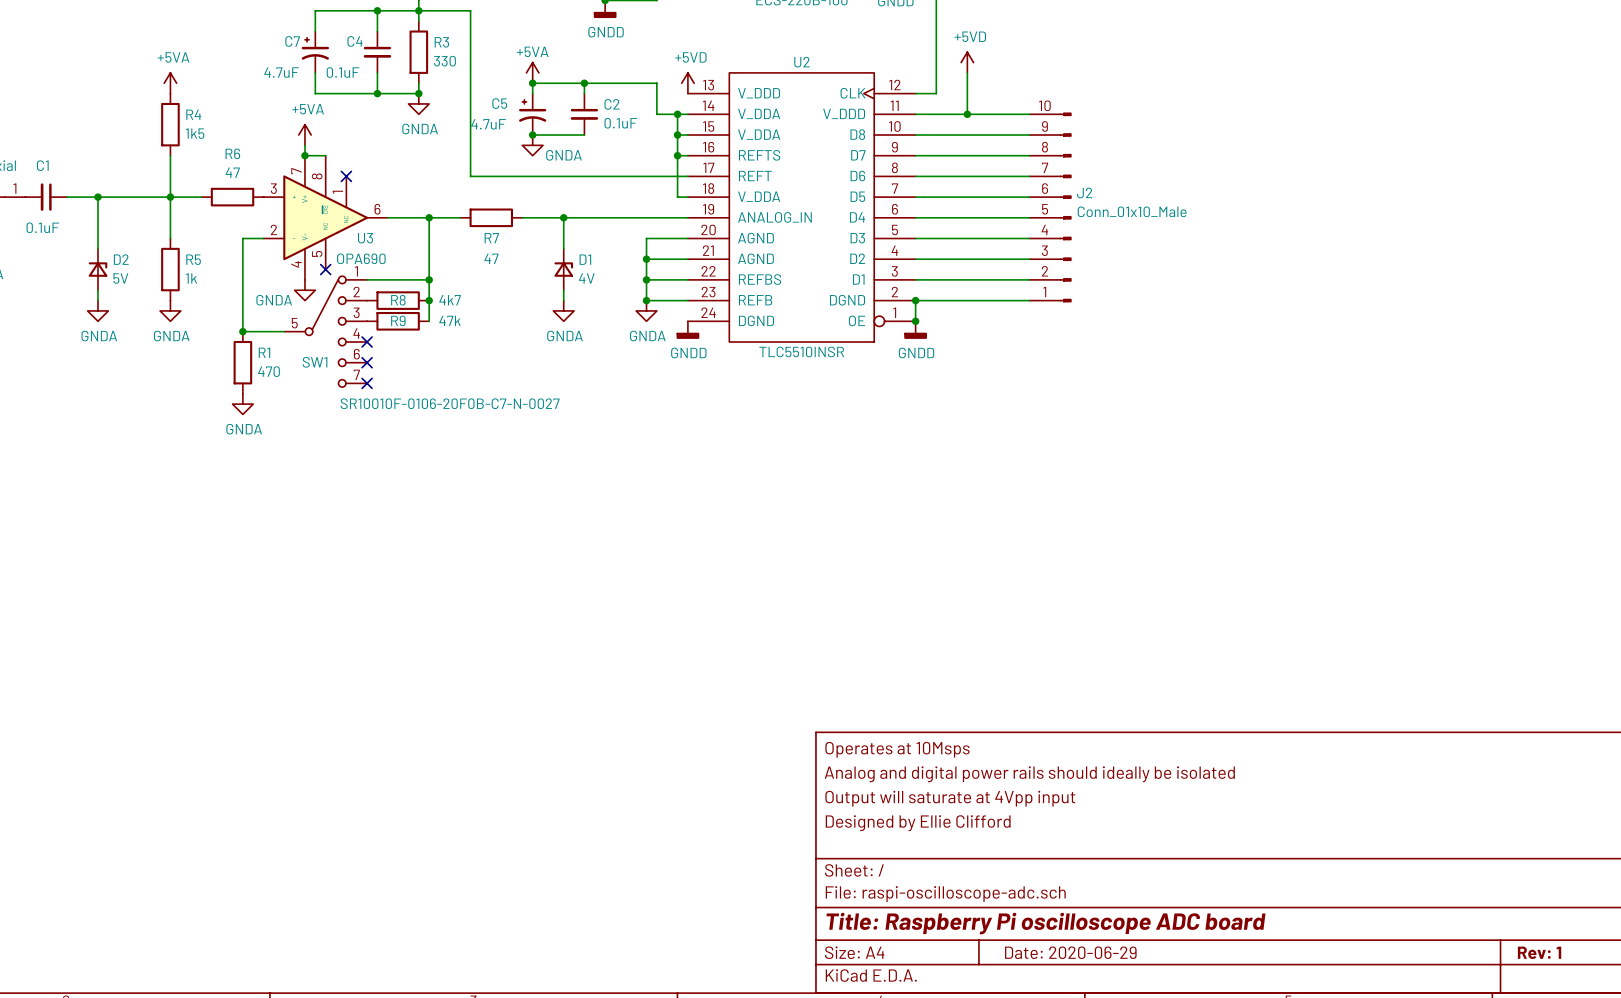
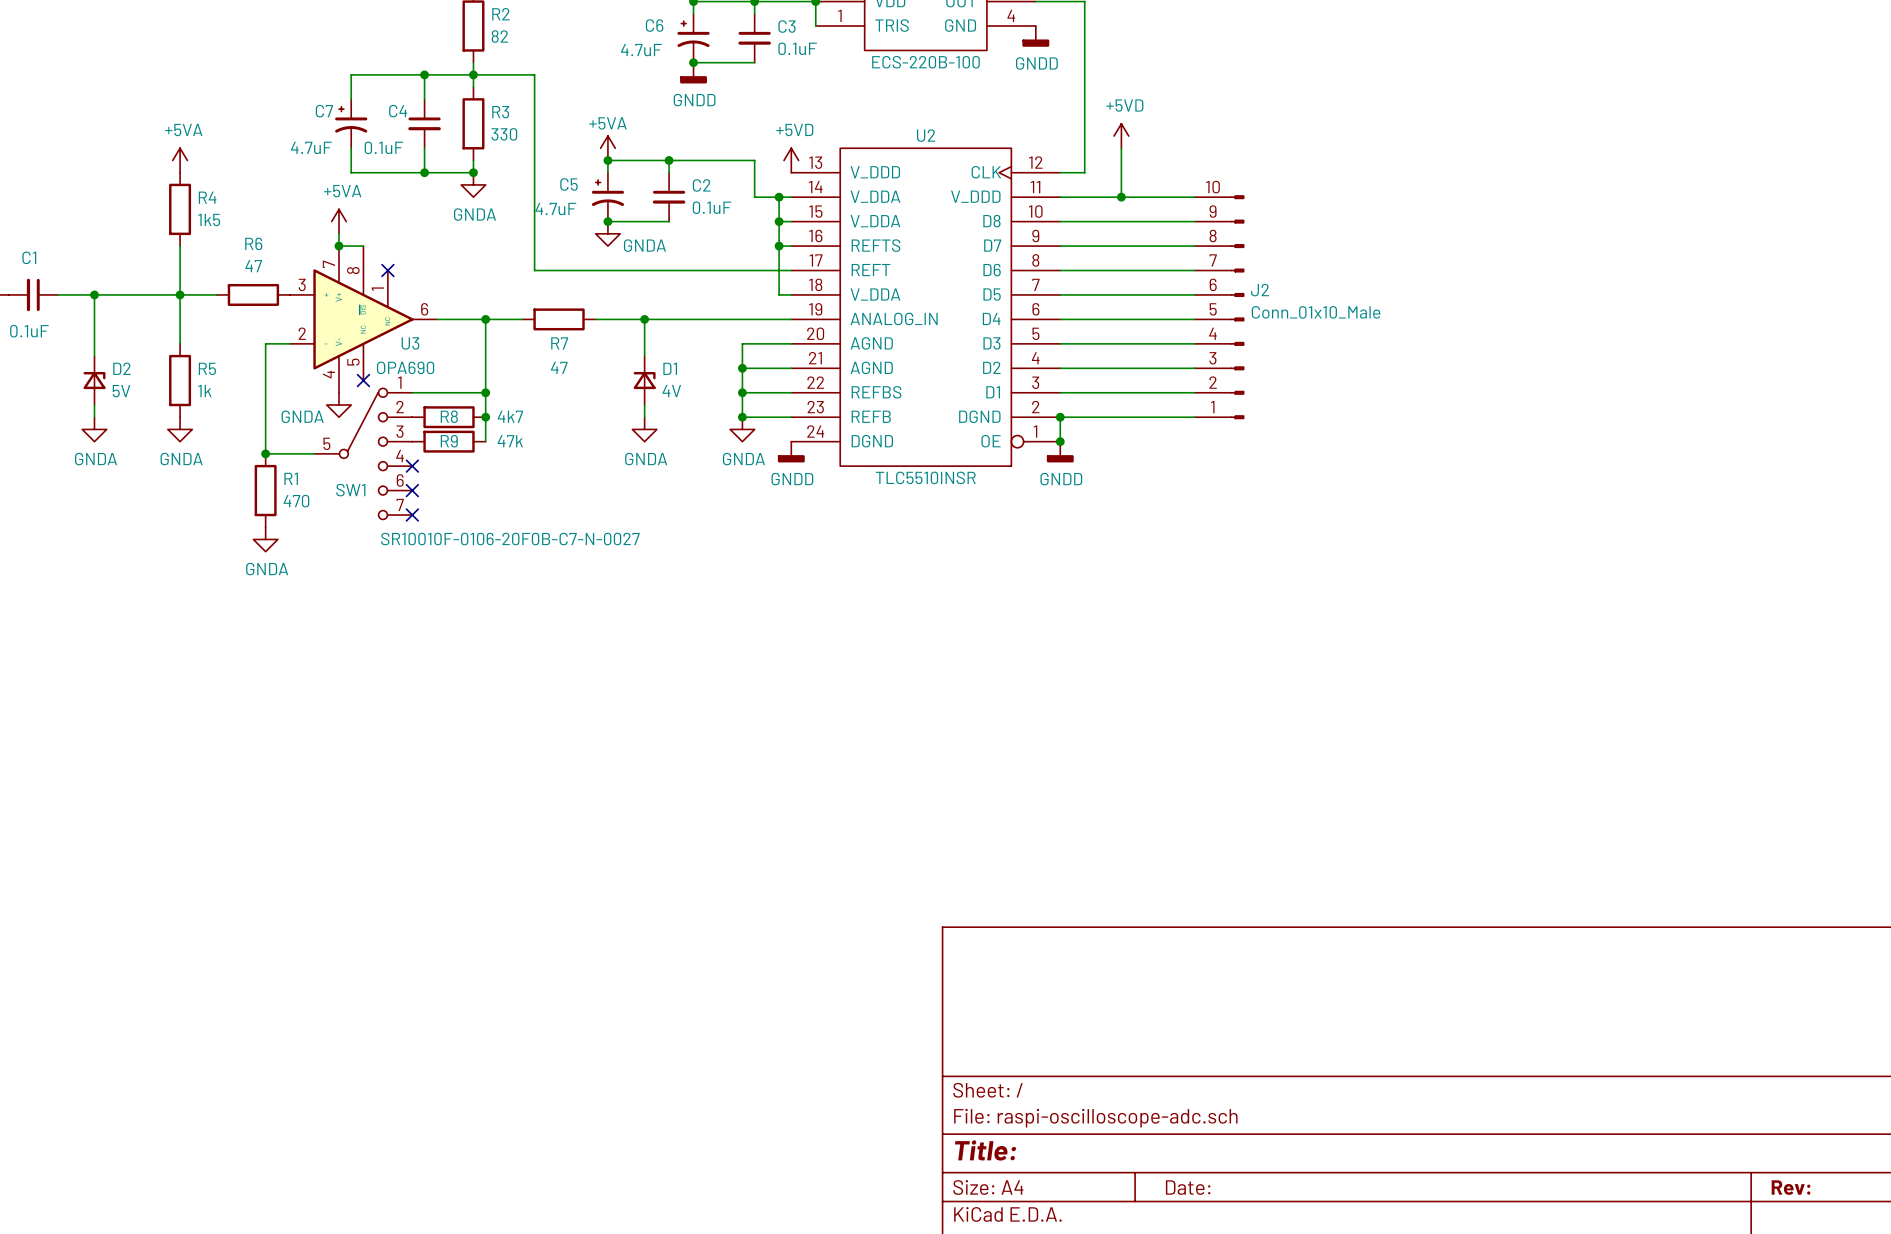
title block: Operates at 10Msps (897, 749) -> none
title block: Analog and digital power rails should ideally be isolated (1029, 774) -> none
title block: Output will saturate at 4Vpp input (950, 798) -> none
title block: Designed by Ellie Clifford (918, 823) -> none
title block: Title: Raspberry Pi oscilloscope ADC board (1045, 923) -> Title: (985, 1150)
title block: Date: 2020-06-29 (1070, 952) -> Date: (1188, 1187)
title block: Rev: 1 (1539, 952) -> Rev: (1791, 1187)

